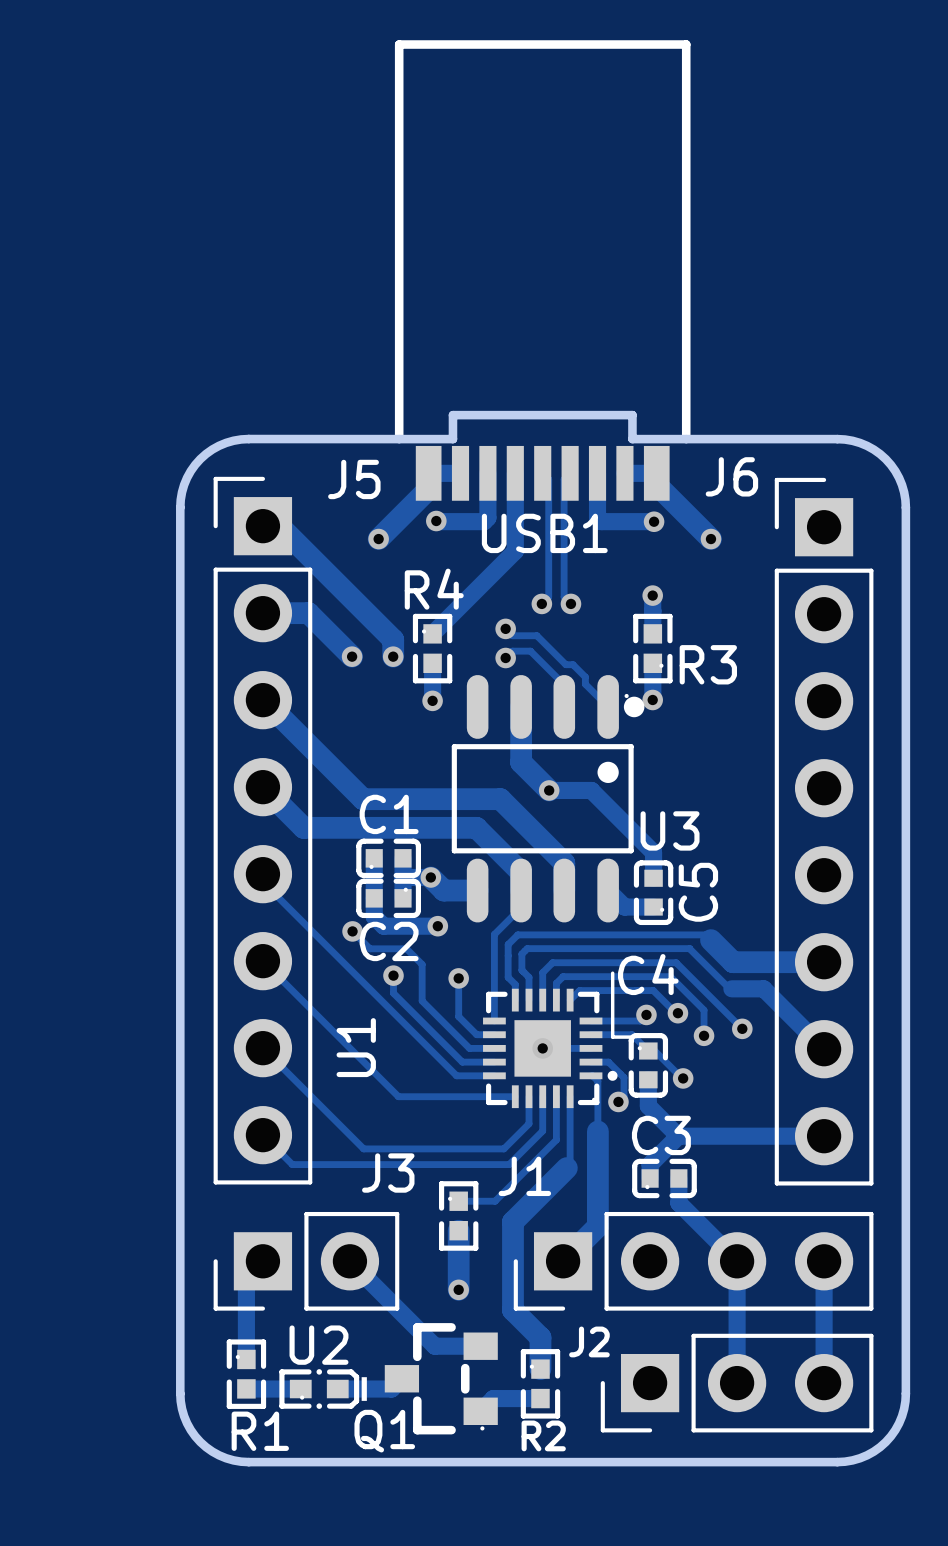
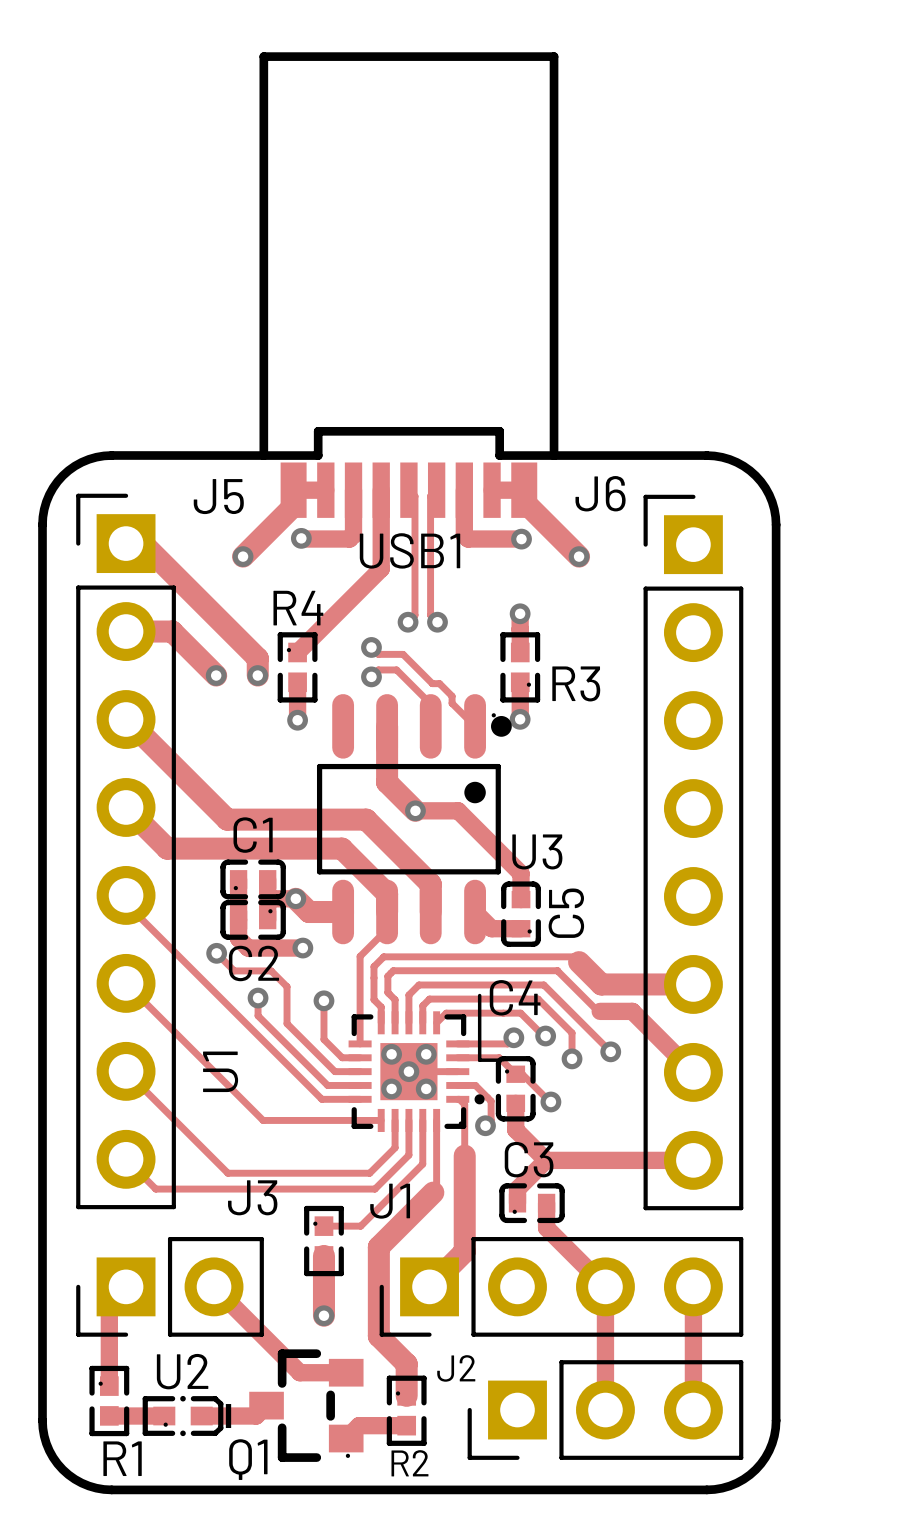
via: none -> (391, 1054)
via: none -> (426, 1054)
via: none -> (391, 1088)
via: none -> (426, 1088)

